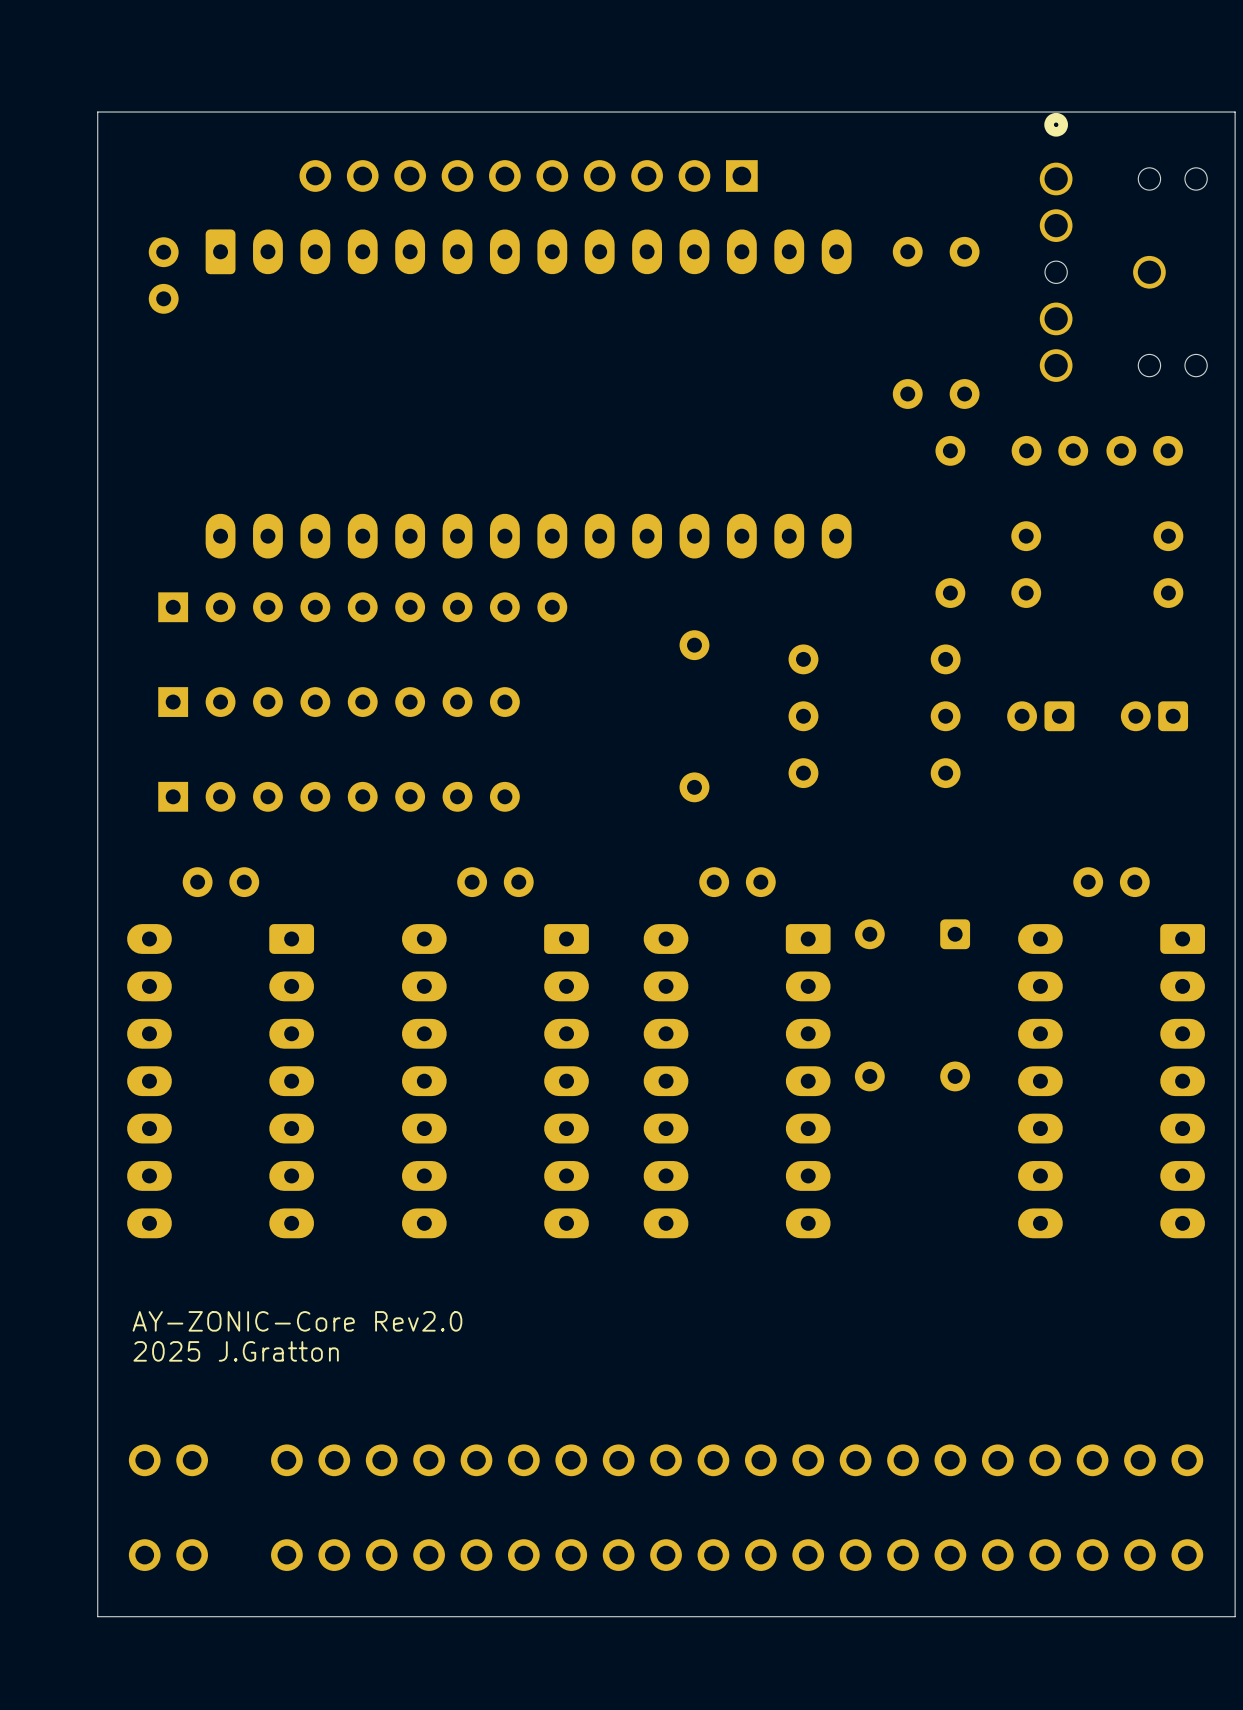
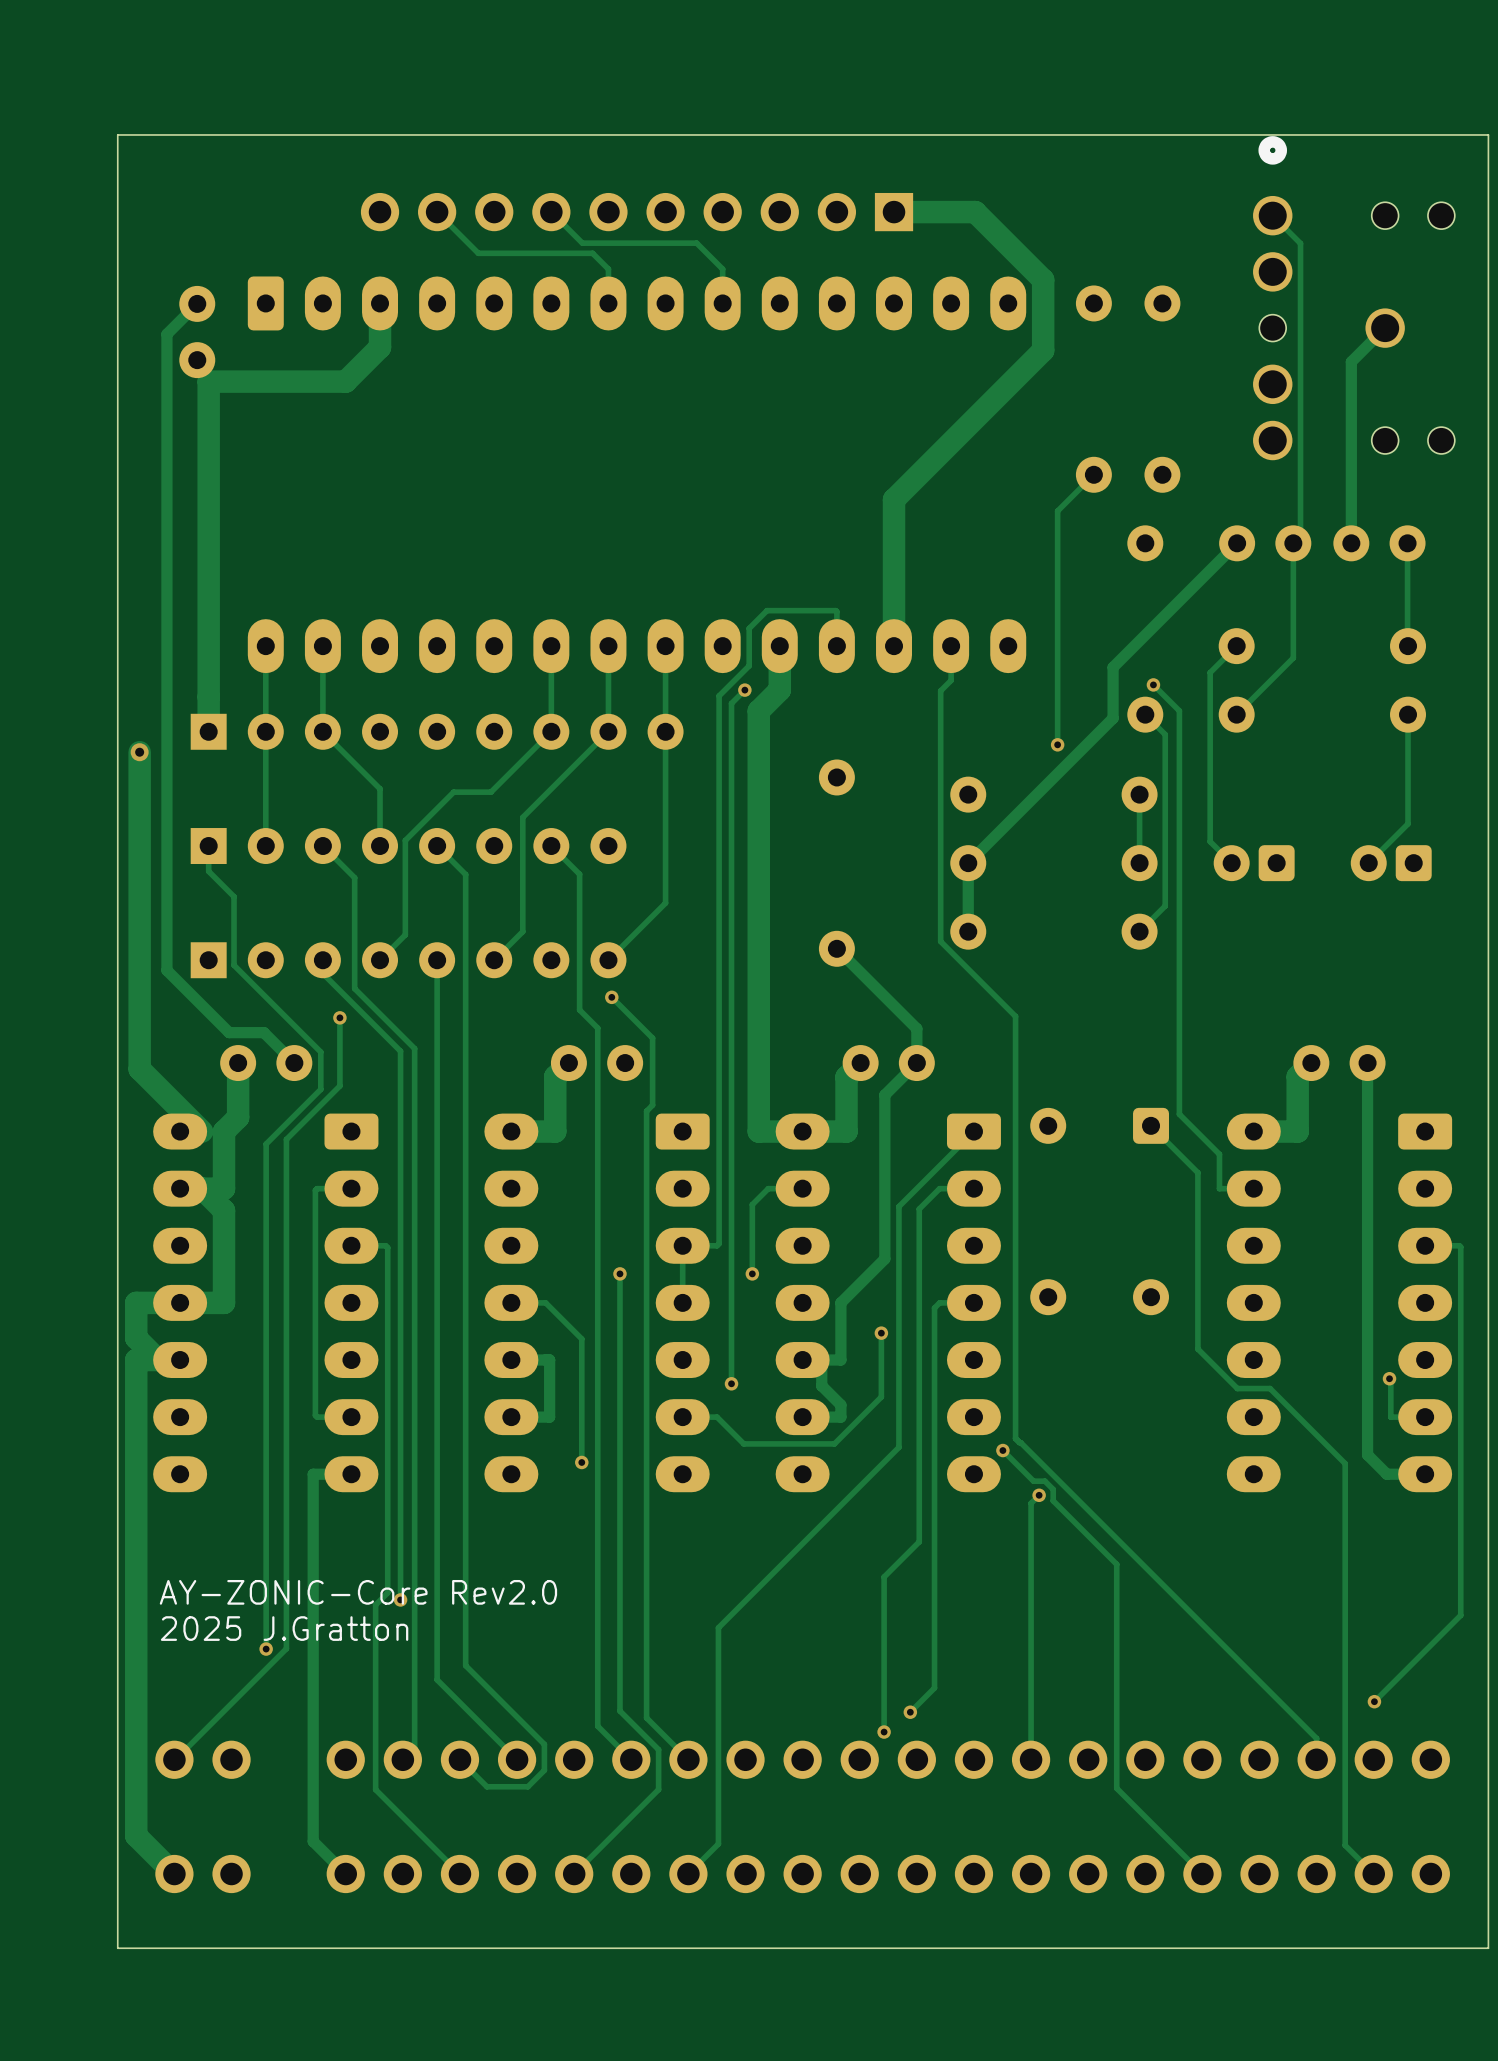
track: none -> (437, 212) (478, 253) (592, 253) (608, 269) (608, 303)
track: none -> (551, 212) (582, 243) (696, 243) (722, 269) (722, 303)
track: none -> (894, 212) (975, 212) (1043, 279) (1043, 350) (894, 499) (894, 646)
track: none -> (1272, 215) (1300, 243) (1300, 536) (1293, 543) (1293, 657) (1236, 714)
track: none -> (380, 303) (380, 347) (345, 381) (208, 381) (208, 731)
track: none -> (197, 303) (166, 334) (166, 970) (229, 1032) (263, 1032) (294, 1063)
track: none -> (1385, 328) (1351, 361) (1351, 543)
track: none -> (1093, 474) (1057, 511) (1057, 744)
track: none -> (1237, 543) (1113, 667) (1113, 718) (968, 863) (968, 931)
track: none -> (1407, 543) (1408, 646)
track: none -> (265, 646) (265, 846)
track: none -> (322, 646) (322, 731) (380, 788) (380, 846)
track: none -> (551, 646) (551, 731) (490, 792) (453, 792) (405, 840) (405, 934) (380, 960)
track: none -> (608, 646) (608, 731) (522, 817) (522, 931) (494, 960)
track: none -> (665, 646) (665, 903) (608, 960)
track: none -> (779, 646) (779, 690) (758, 711) (758, 1131) (846, 1131) (846, 1077) (860, 1063)
track: none -> (836, 646) (835, 610) (766, 610) (749, 628) (749, 665) (719, 695) (719, 1243) (717, 1245) (682, 1245) (682, 1302)
track: none -> (951, 646) (951, 680) (940, 690) (940, 941) (1015, 1016) (1015, 1438) (1316, 1738) (1316, 1759)
track: none -> (1236, 646) (1210, 672) (1210, 841) (1231, 863)
track: none -> (1153, 684) (1179, 710) (1179, 1114) (1219, 1154) (1219, 1188) (1253, 1188)
via: none -> (1153, 684)
track: none -> (744, 690) (731, 703) (731, 1383)
via: none -> (744, 690)
track: none -> (1145, 714) (1165, 734) (1165, 906) (1139, 931)
track: none -> (1408, 714) (1408, 823) (1368, 863)
via: none -> (1057, 744)
track: none -> (139, 752) (139, 1069) (202, 1131)
via: none -> (139, 752)
track: none -> (1139, 794) (1139, 863)
track: none -> (208, 846) (208, 871) (234, 896) (234, 965) (320, 1052) (320, 1089) (266, 1144) (266, 1649)
track: none -> (322, 846) (354, 877) (354, 988) (414, 1048) (414, 1748) (402, 1759)
track: none -> (437, 846) (465, 874) (465, 1665) (544, 1744) (544, 1770) (527, 1786) (486, 1786) (459, 1759)
track: none -> (551, 846) (579, 874) (579, 1009) (597, 1028) (597, 1726) (631, 1759)
track: none -> (836, 948) (916, 1028) (916, 1063) (884, 1095) (884, 1258) (840, 1302) (840, 1360) (802, 1360)
track: none -> (322, 960) (322, 973) (400, 1051) (400, 1599)
track: none -> (437, 960) (437, 1679) (517, 1759)
track: none -> (611, 997) (652, 1038) (652, 1105) (646, 1111) (646, 1717) (688, 1759)
via: none -> (611, 997)
track: none -> (339, 1017) (339, 1085) (286, 1139) (286, 1648) (174, 1759)
via: none -> (339, 1017)
track: none -> (238, 1063) (238, 1117) (224, 1131) (224, 1188) (180, 1188)
track: none -> (568, 1063) (555, 1076) (555, 1131) (511, 1131)
track: none -> (1311, 1063) (1297, 1076) (1297, 1131) (1253, 1131)
track: none -> (1367, 1063) (1367, 1454) (1386, 1474) (1425, 1474)
track: none -> (1151, 1125) (1197, 1172) (1197, 1349) (1237, 1388) (1270, 1388) (1345, 1463) (1345, 1845) (1373, 1874)
track: none -> (973, 1131) (898, 1206) (898, 1447) (718, 1627) (718, 1843) (688, 1874)
track: none -> (202, 1188) (224, 1210) (224, 1302) (136, 1302) (136, 1338) (158, 1360)
track: none -> (351, 1188) (317, 1188) (315, 1190) (315, 1415) (317, 1417) (351, 1417)
track: none -> (802, 1188) (768, 1188) (752, 1204) (752, 1273)
track: none -> (973, 1188) (939, 1188) (919, 1209) (919, 1541) (884, 1577) (884, 1732)
track: none -> (351, 1245) (385, 1245) (387, 1247) (387, 1592) (375, 1604) (375, 1789) (459, 1874)
track: none -> (1425, 1245) (1460, 1247) (1460, 1615) (1374, 1701)
track: none -> (619, 1273) (619, 1711) (658, 1749) (658, 1789) (574, 1874)
via: none -> (619, 1273)
via: none -> (752, 1273)
track: none -> (511, 1302) (545, 1302) (581, 1338) (581, 1462)
track: none -> (973, 1302) (939, 1302) (934, 1308) (934, 1688) (910, 1712)
track: none -> (881, 1333) (881, 1396) (834, 1443) (743, 1443) (717, 1417) (682, 1417)
via: none -> (881, 1333)
track: none -> (180, 1360) (136, 1360) (136, 1835) (174, 1874)
track: none -> (511, 1360) (549, 1360) (549, 1417) (511, 1417)
track: none -> (821, 1360) (821, 1385) (840, 1404) (840, 1417) (802, 1417)
track: none -> (1389, 1378) (1390, 1417) (1425, 1417)
via: none -> (1389, 1378)
via: none -> (731, 1383)
track: none -> (1002, 1450) (1033, 1481) (1044, 1481) (1053, 1489) (1053, 1500) (1116, 1564) (1116, 1788) (1202, 1874)
via: none -> (1002, 1450)
via: none -> (581, 1462)
track: none -> (351, 1474) (313, 1474) (313, 1841) (345, 1874)
track: none -> (1039, 1495) (1031, 1503) (1031, 1759)
via: none -> (1039, 1495)
via: none -> (400, 1599)
via: none -> (266, 1649)
via: none -> (1374, 1701)
via: none -> (910, 1712)
via: none -> (884, 1732)

